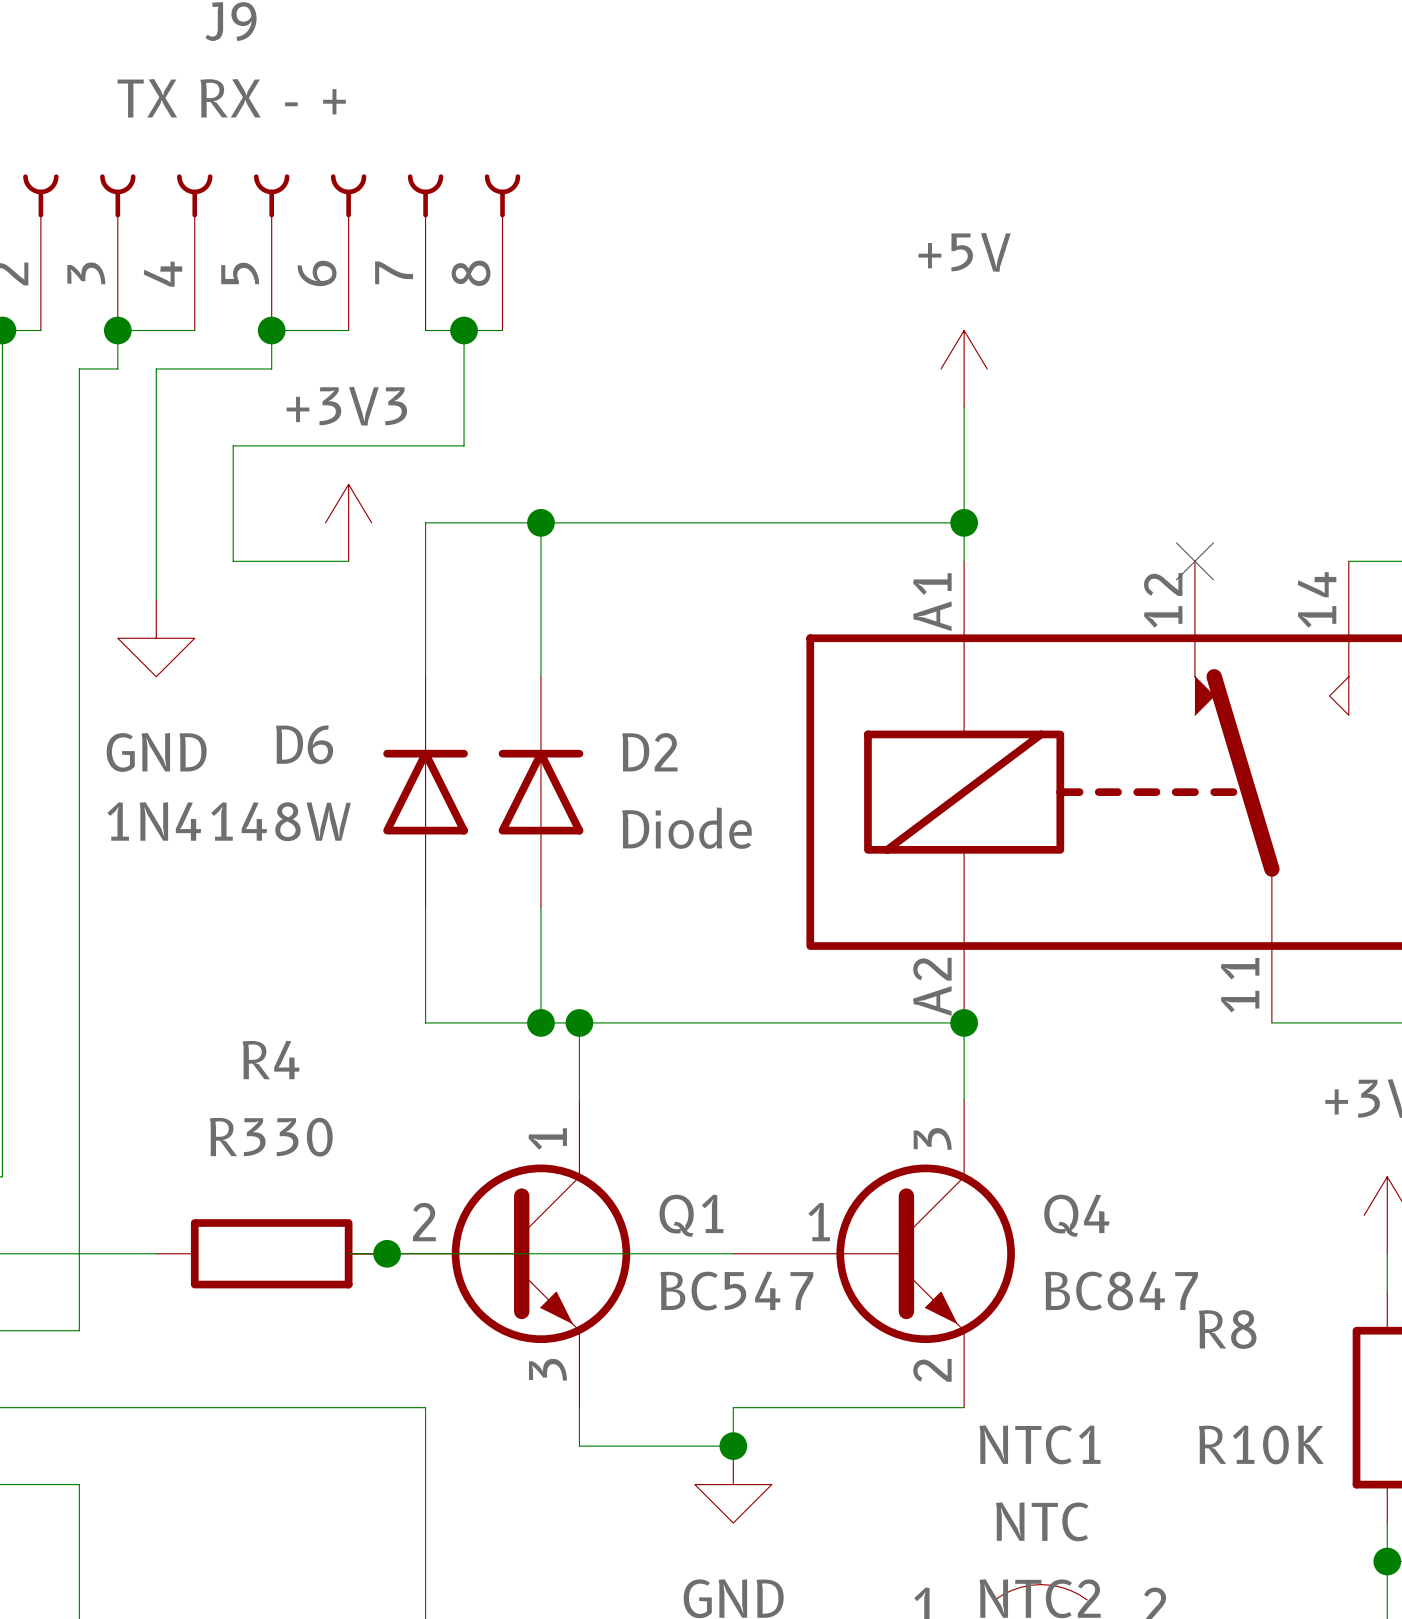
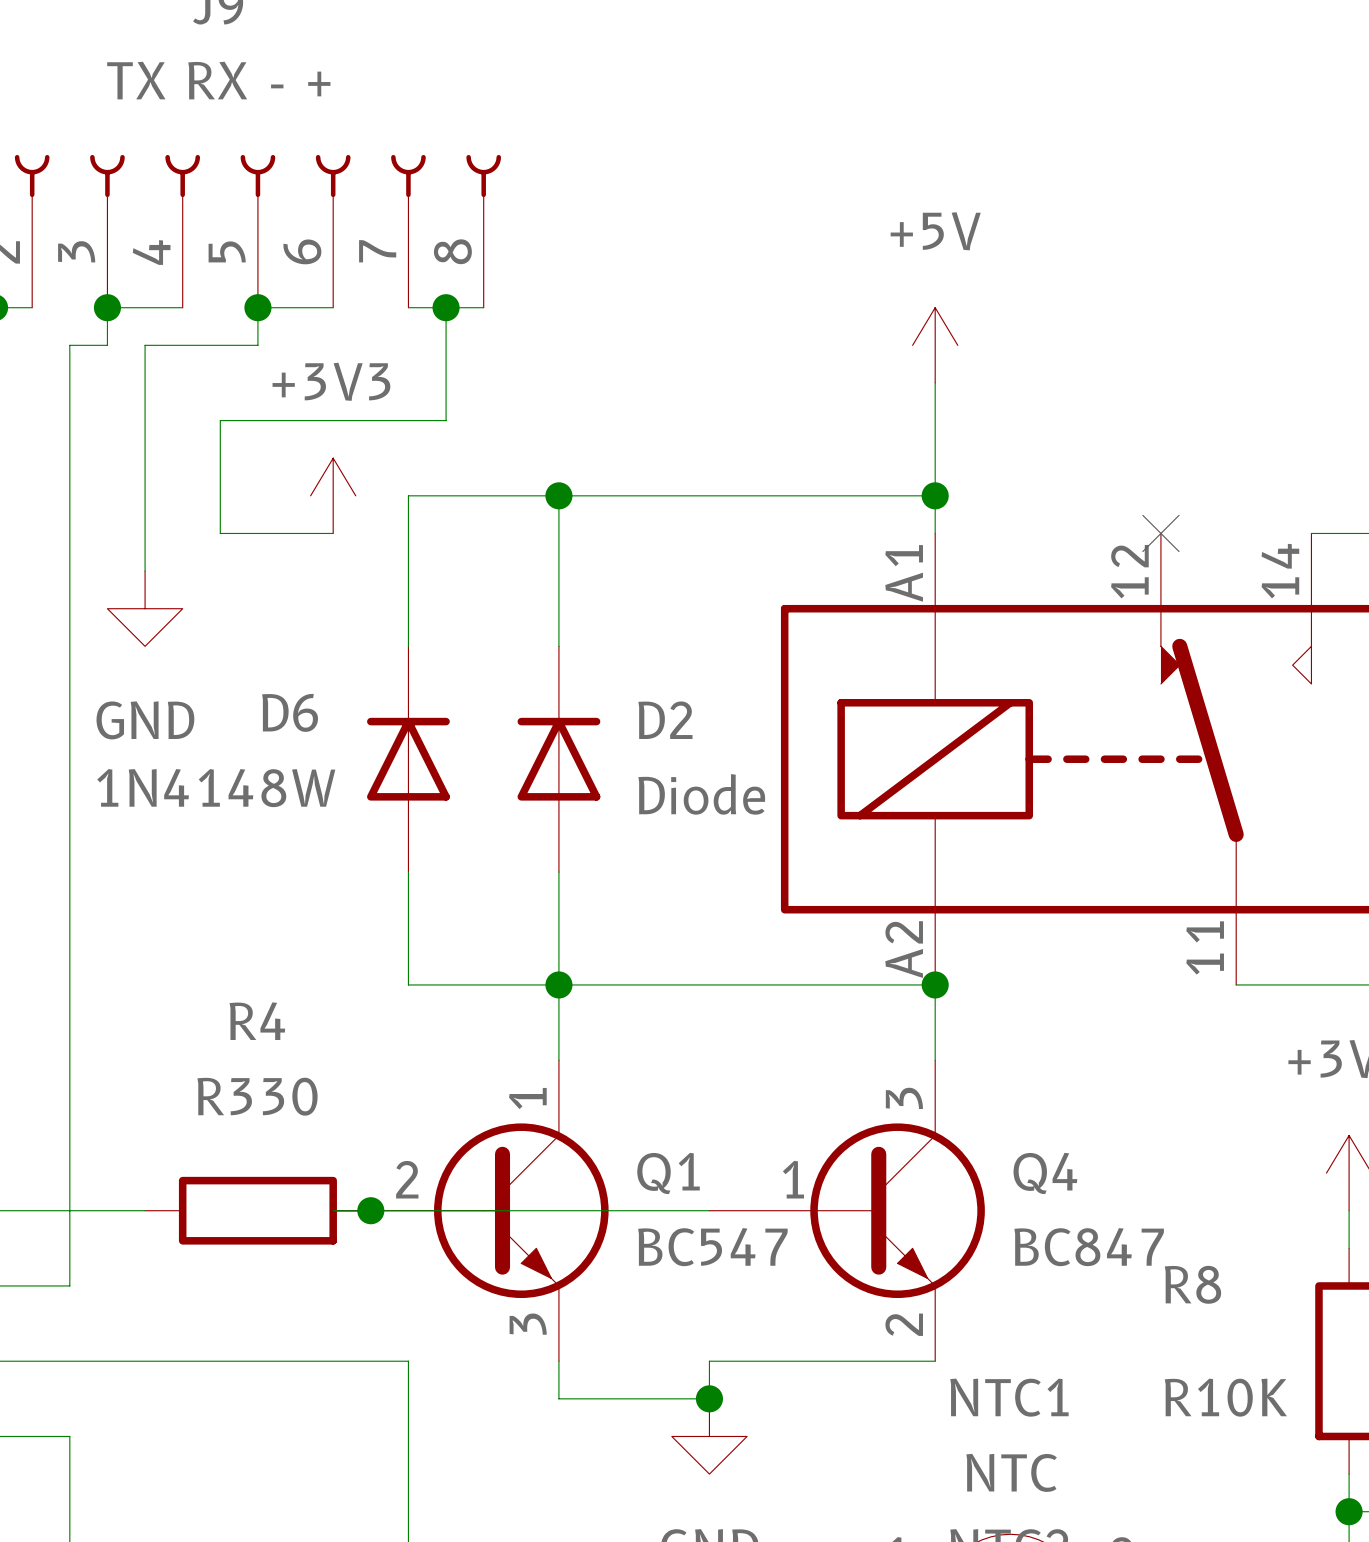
wire: (540, 522) (540, 676) -> (558, 495) (558, 646)
junction position: (540, 522) -> (558, 495)
D2 position: (540, 792) -> (558, 759)
wire: (540, 907) (540, 1022) -> (558, 872) (558, 984)
junction: (540, 1022) -> none

